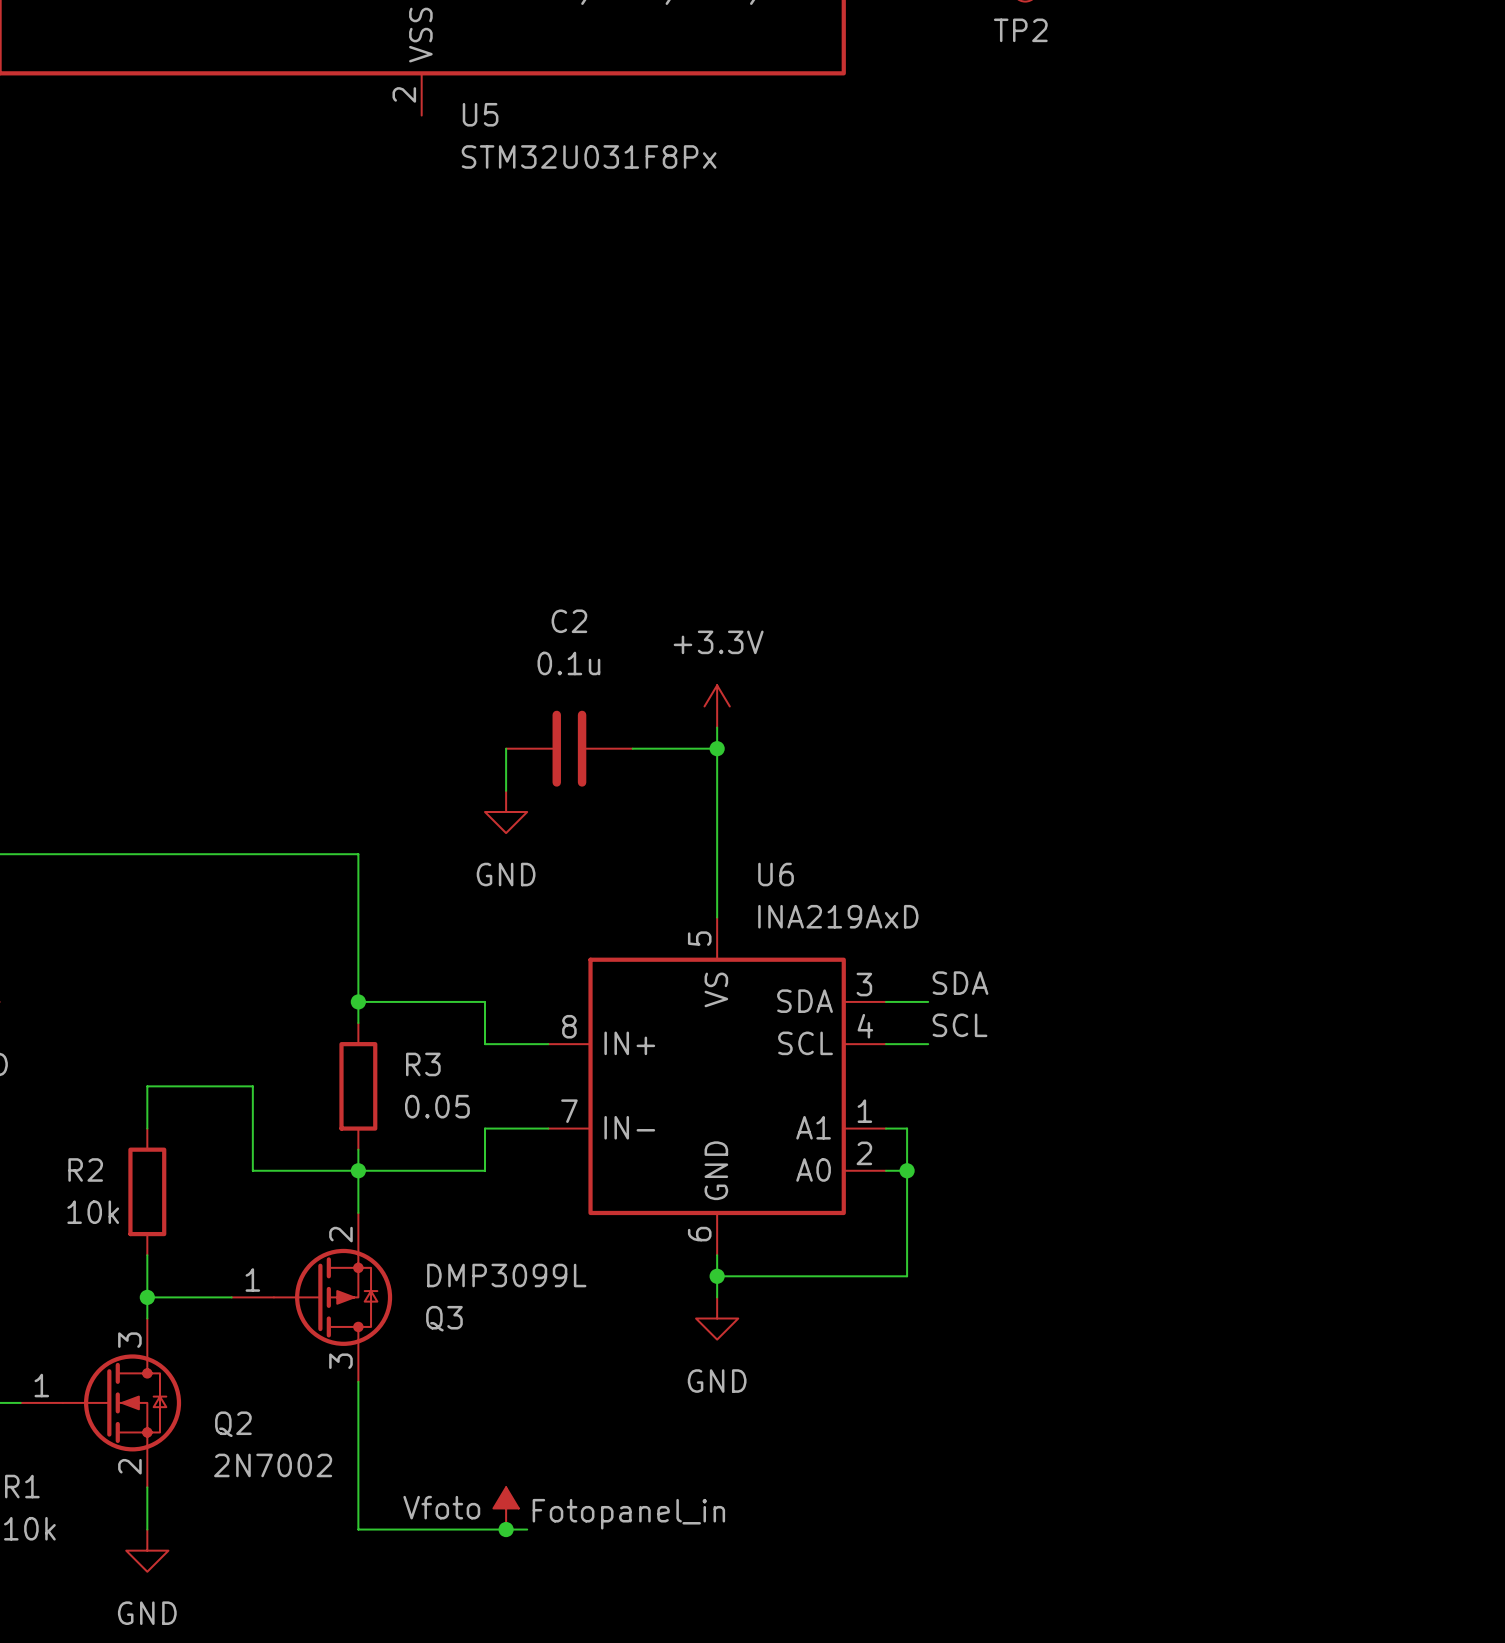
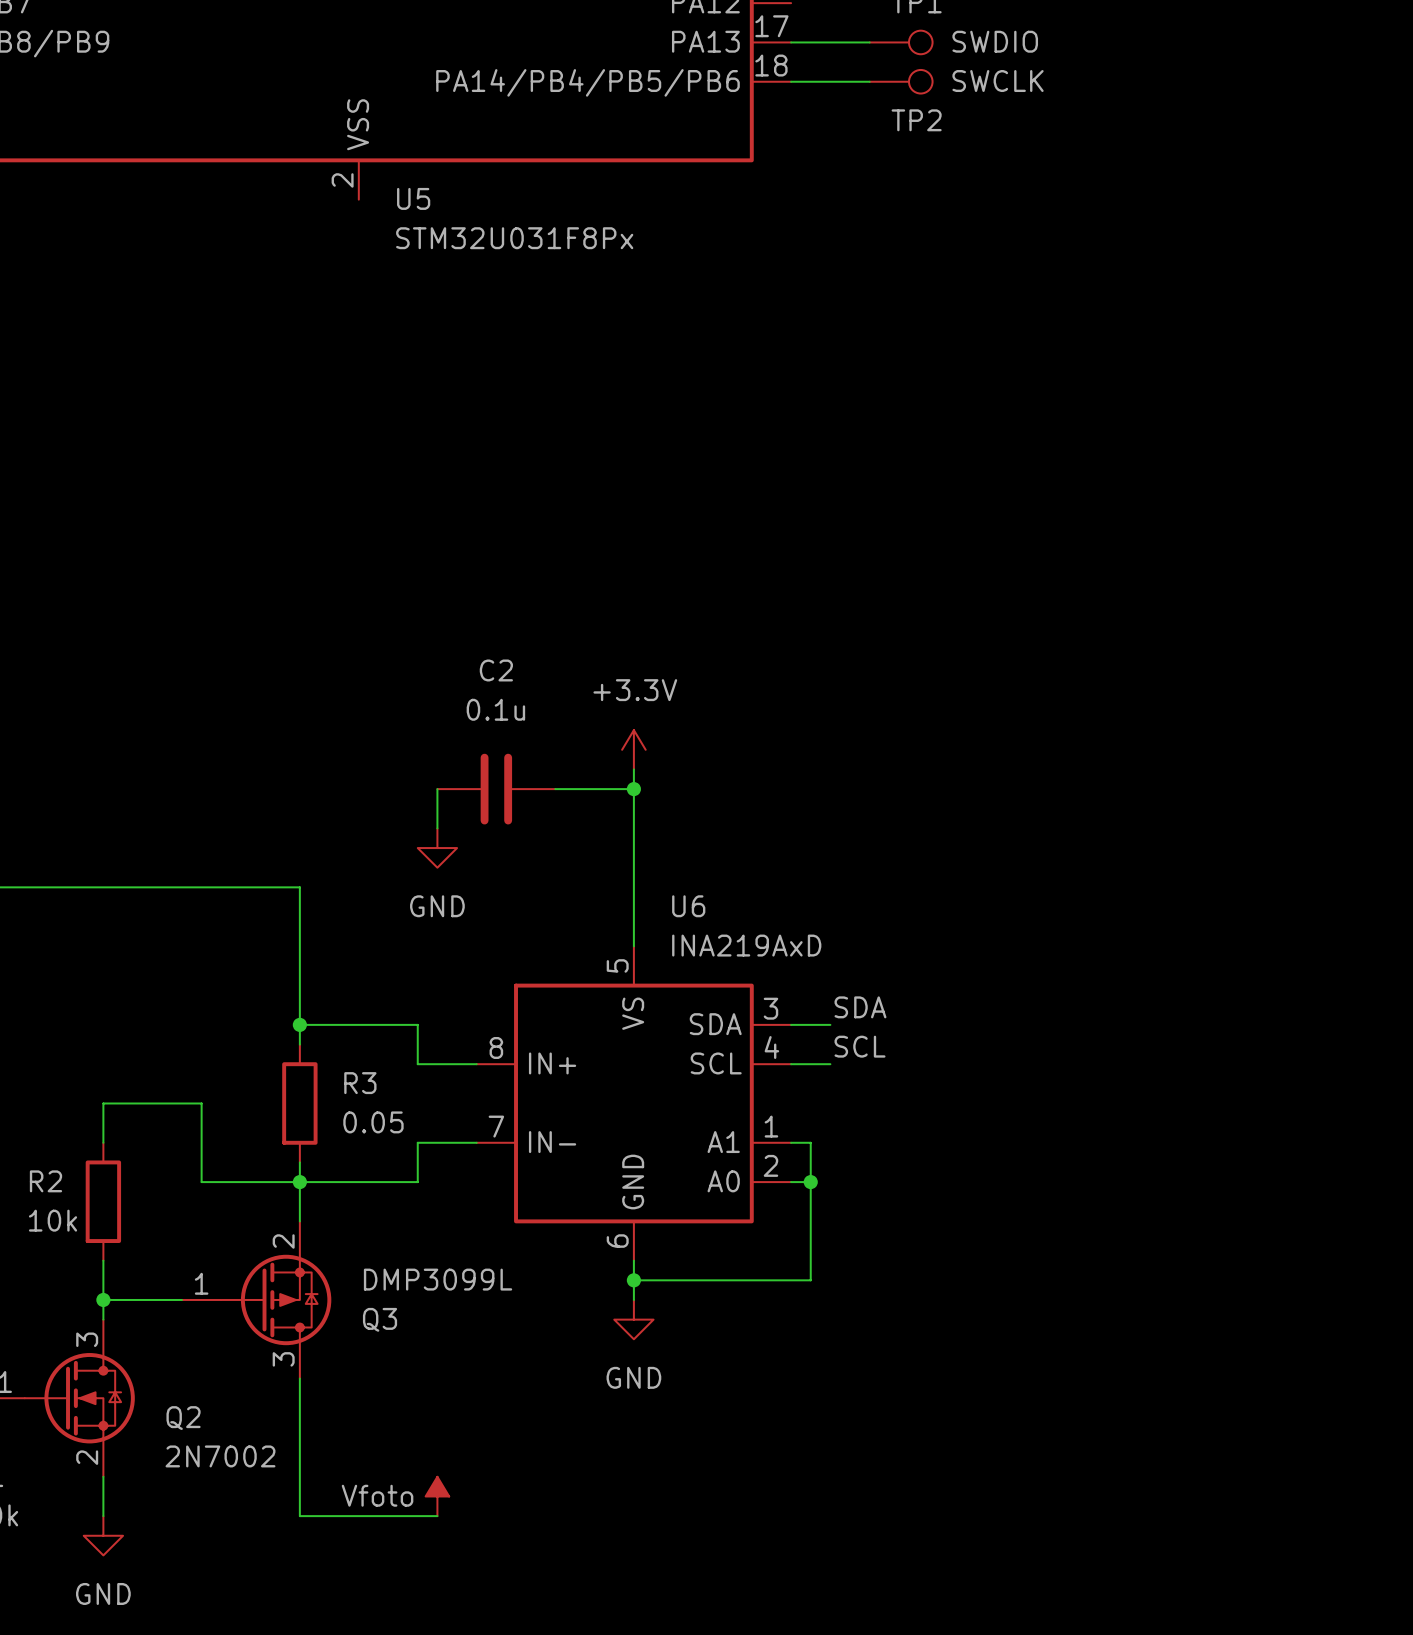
label: Fotopanel_in (628, 1514) -> none
wire: (506, 1529) (527, 1529) -> none
junction: (506, 1529) -> none

